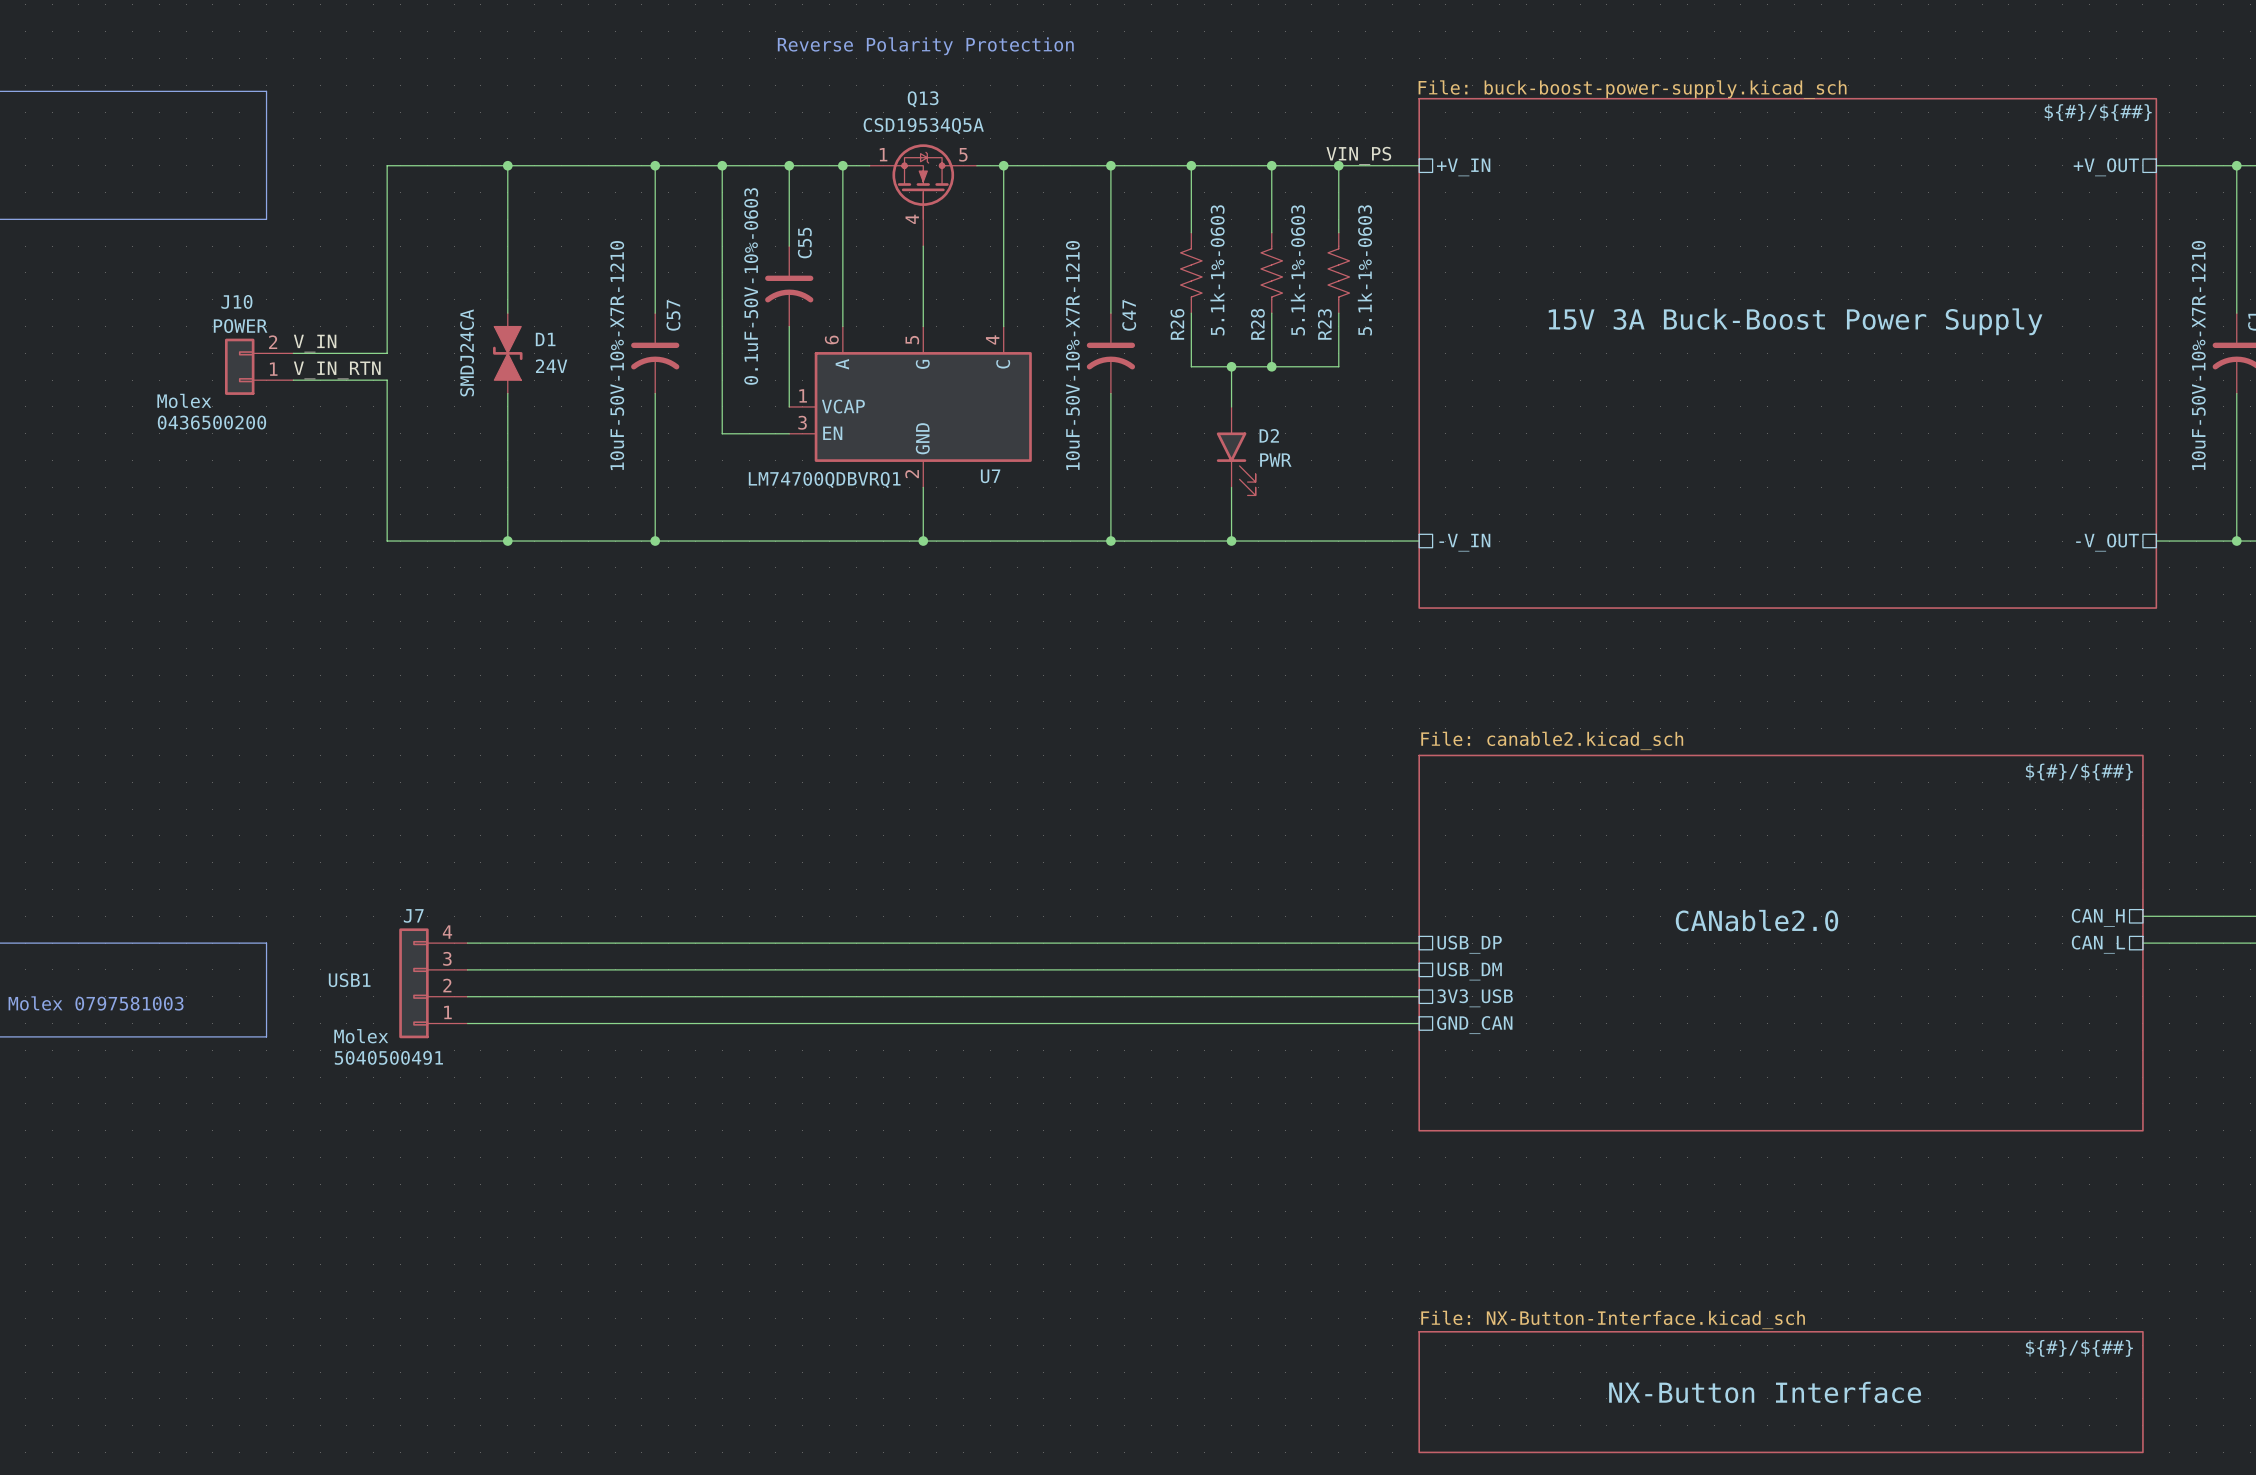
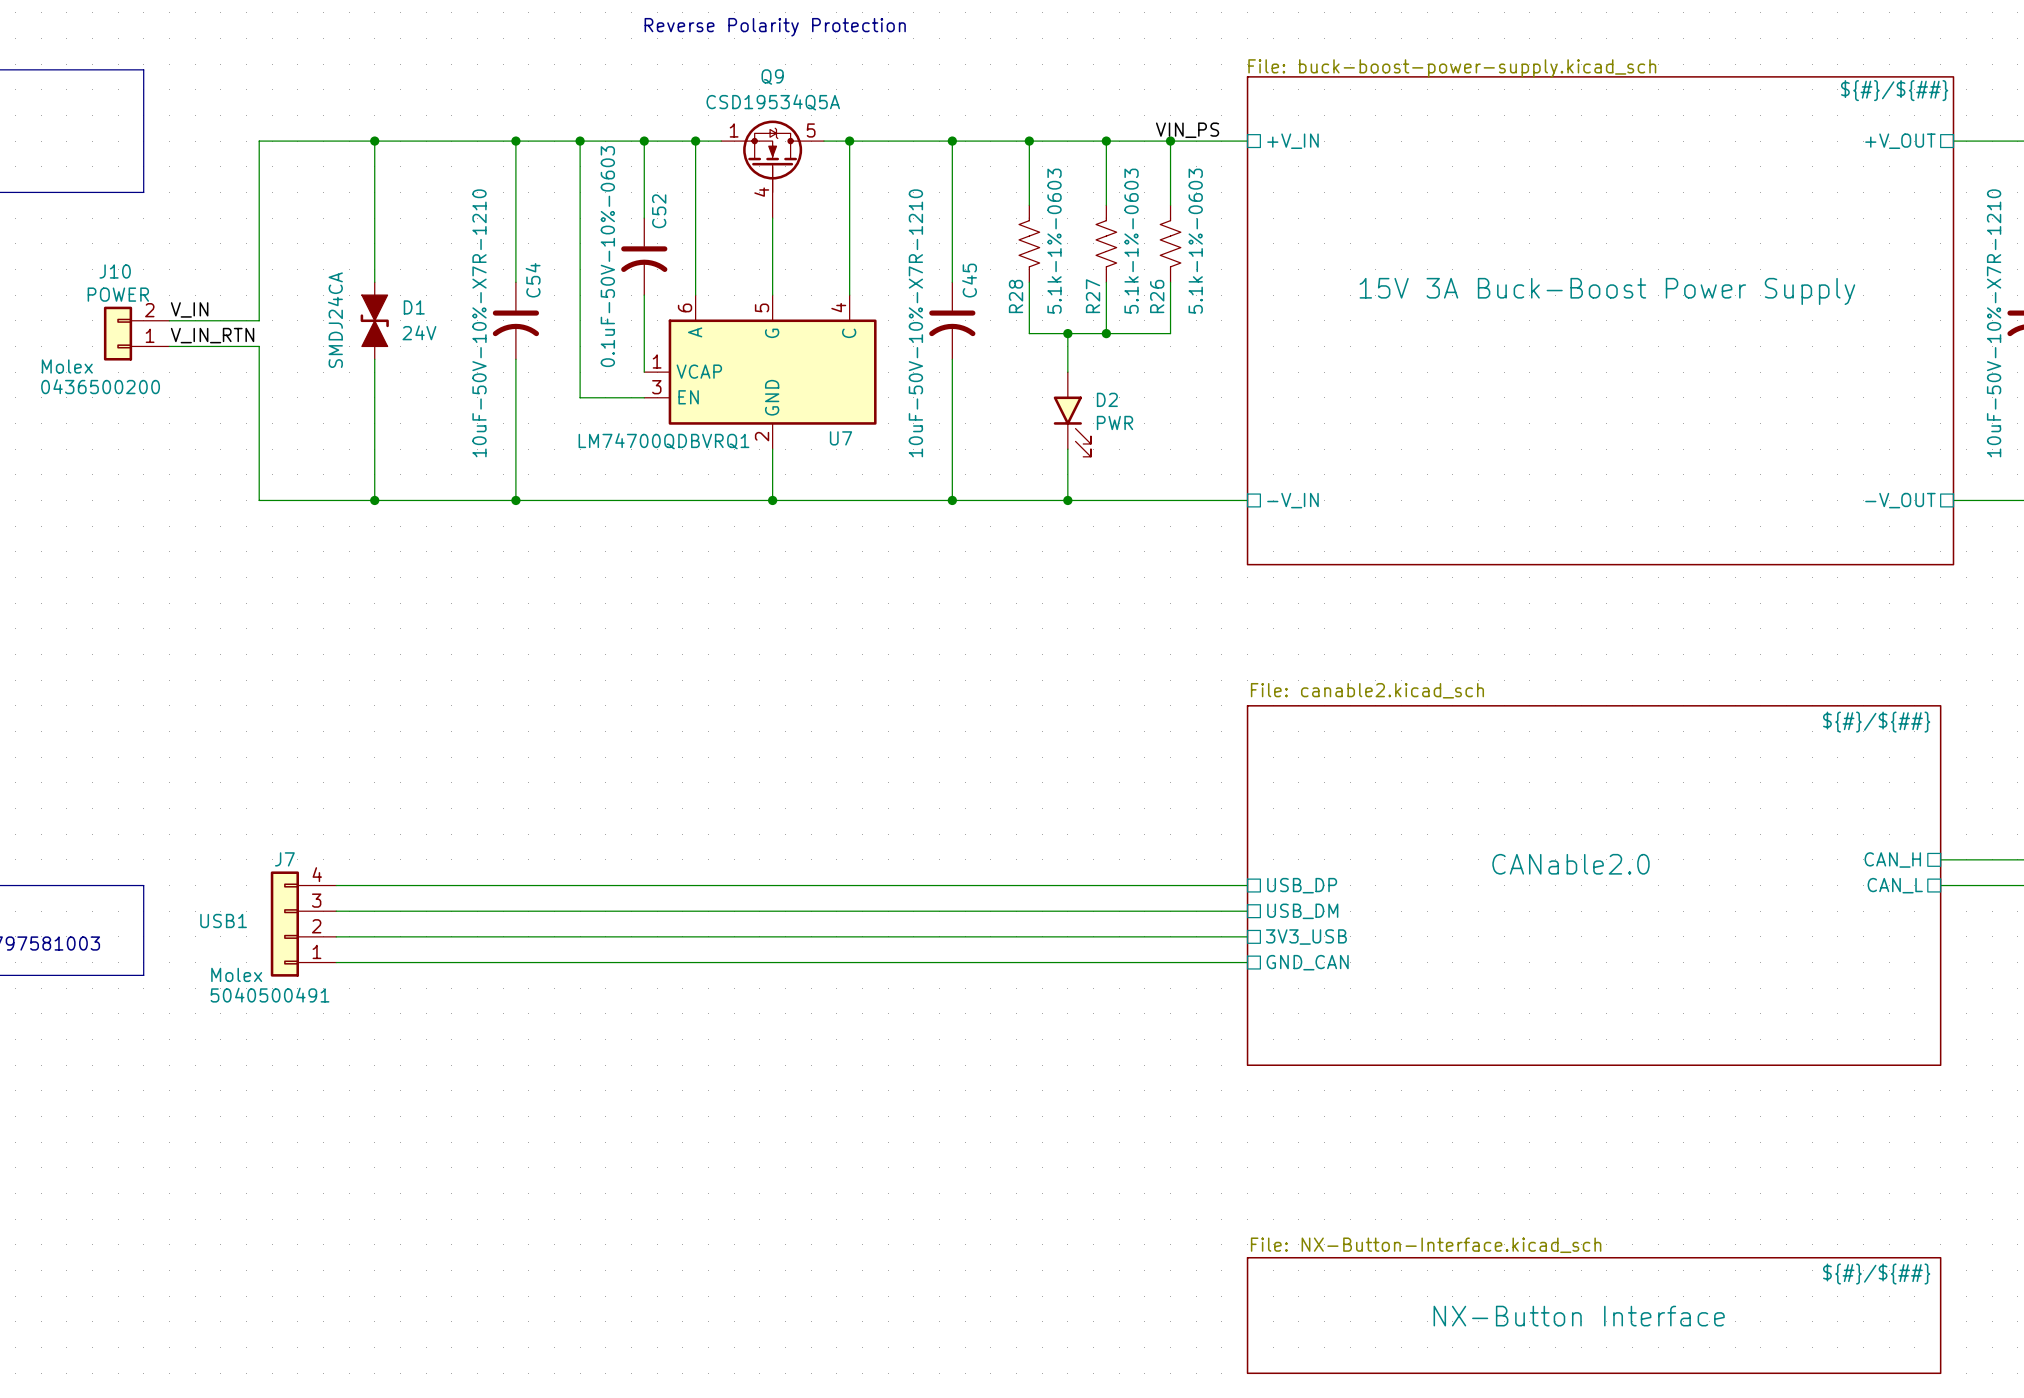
Q13 name: Q13 (923, 99) -> Q9 (772, 77)
C55 name: C55 (804, 243) -> C52 (659, 211)
C57 name: C57 (673, 315) -> C54 (533, 280)
C47 name: C47 (1129, 315) -> C45 (969, 280)
R26 name: R26 (1177, 324) -> R28 (1016, 296)
R28 name: R28 (1257, 324) -> R27 (1093, 296)
R23 name: R23 (1324, 324) -> R26 (1157, 296)

